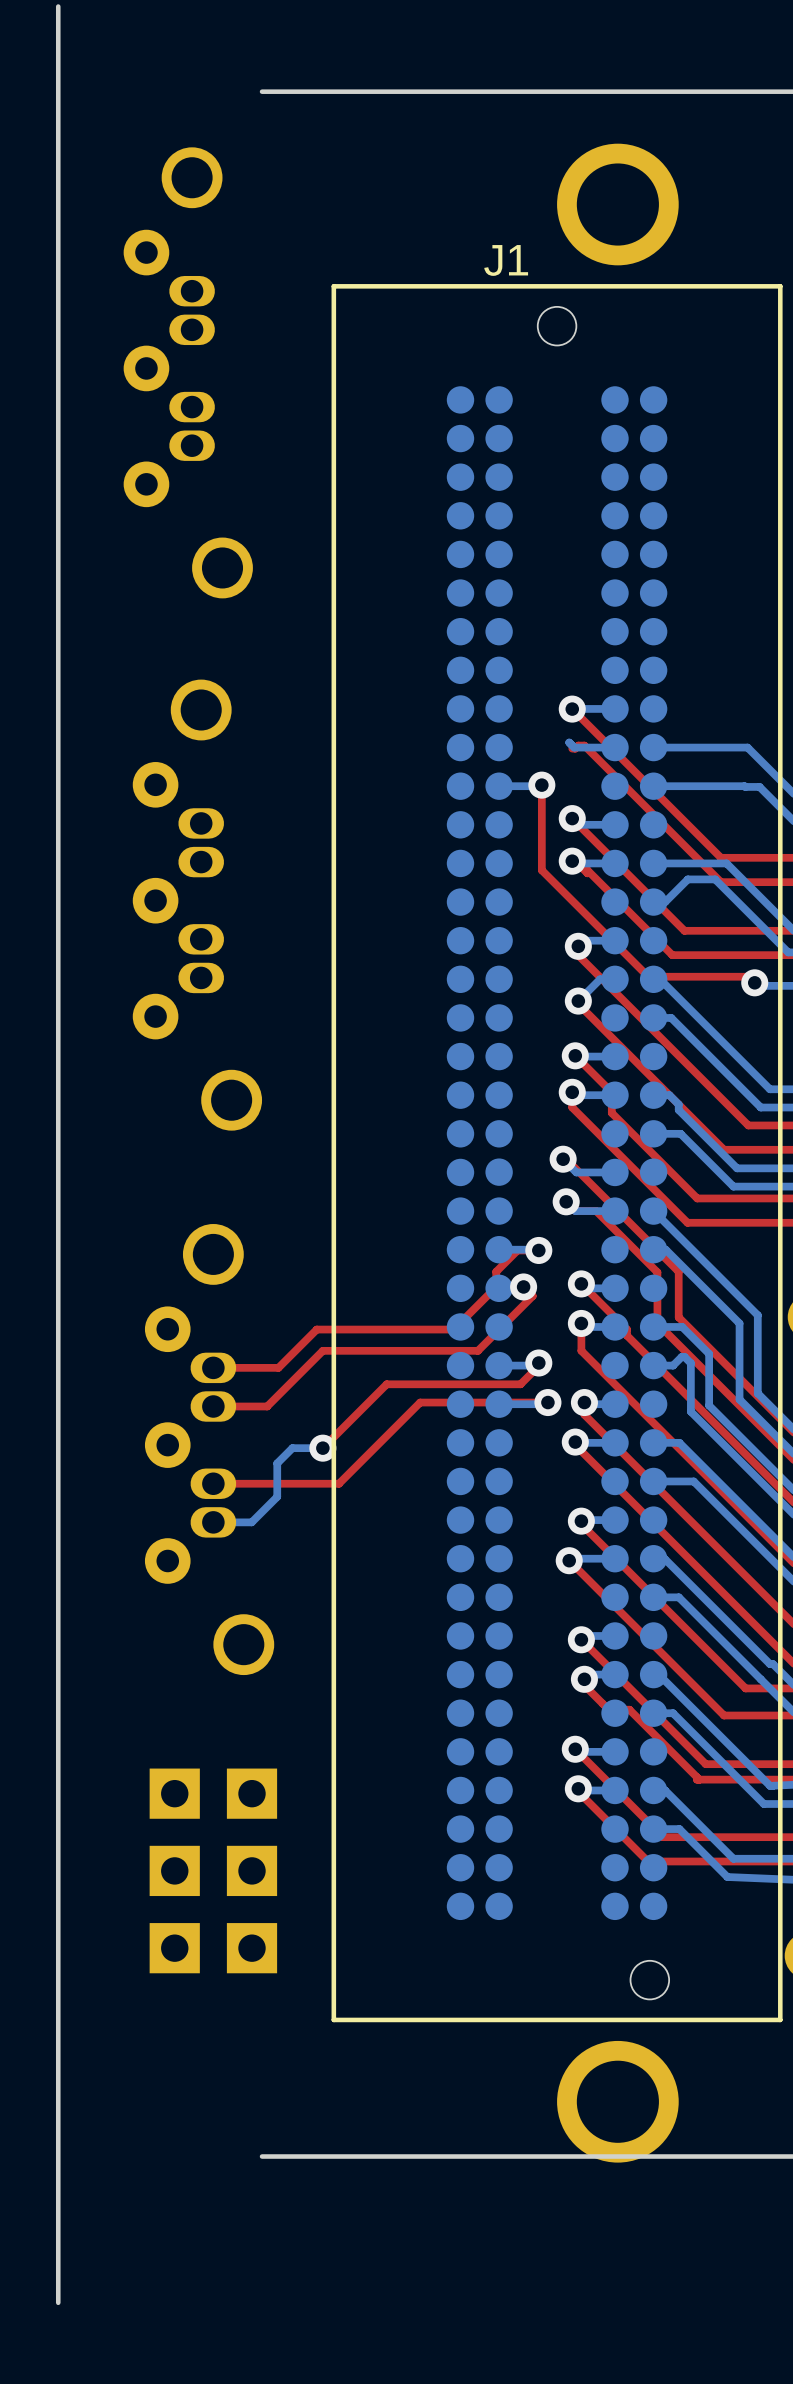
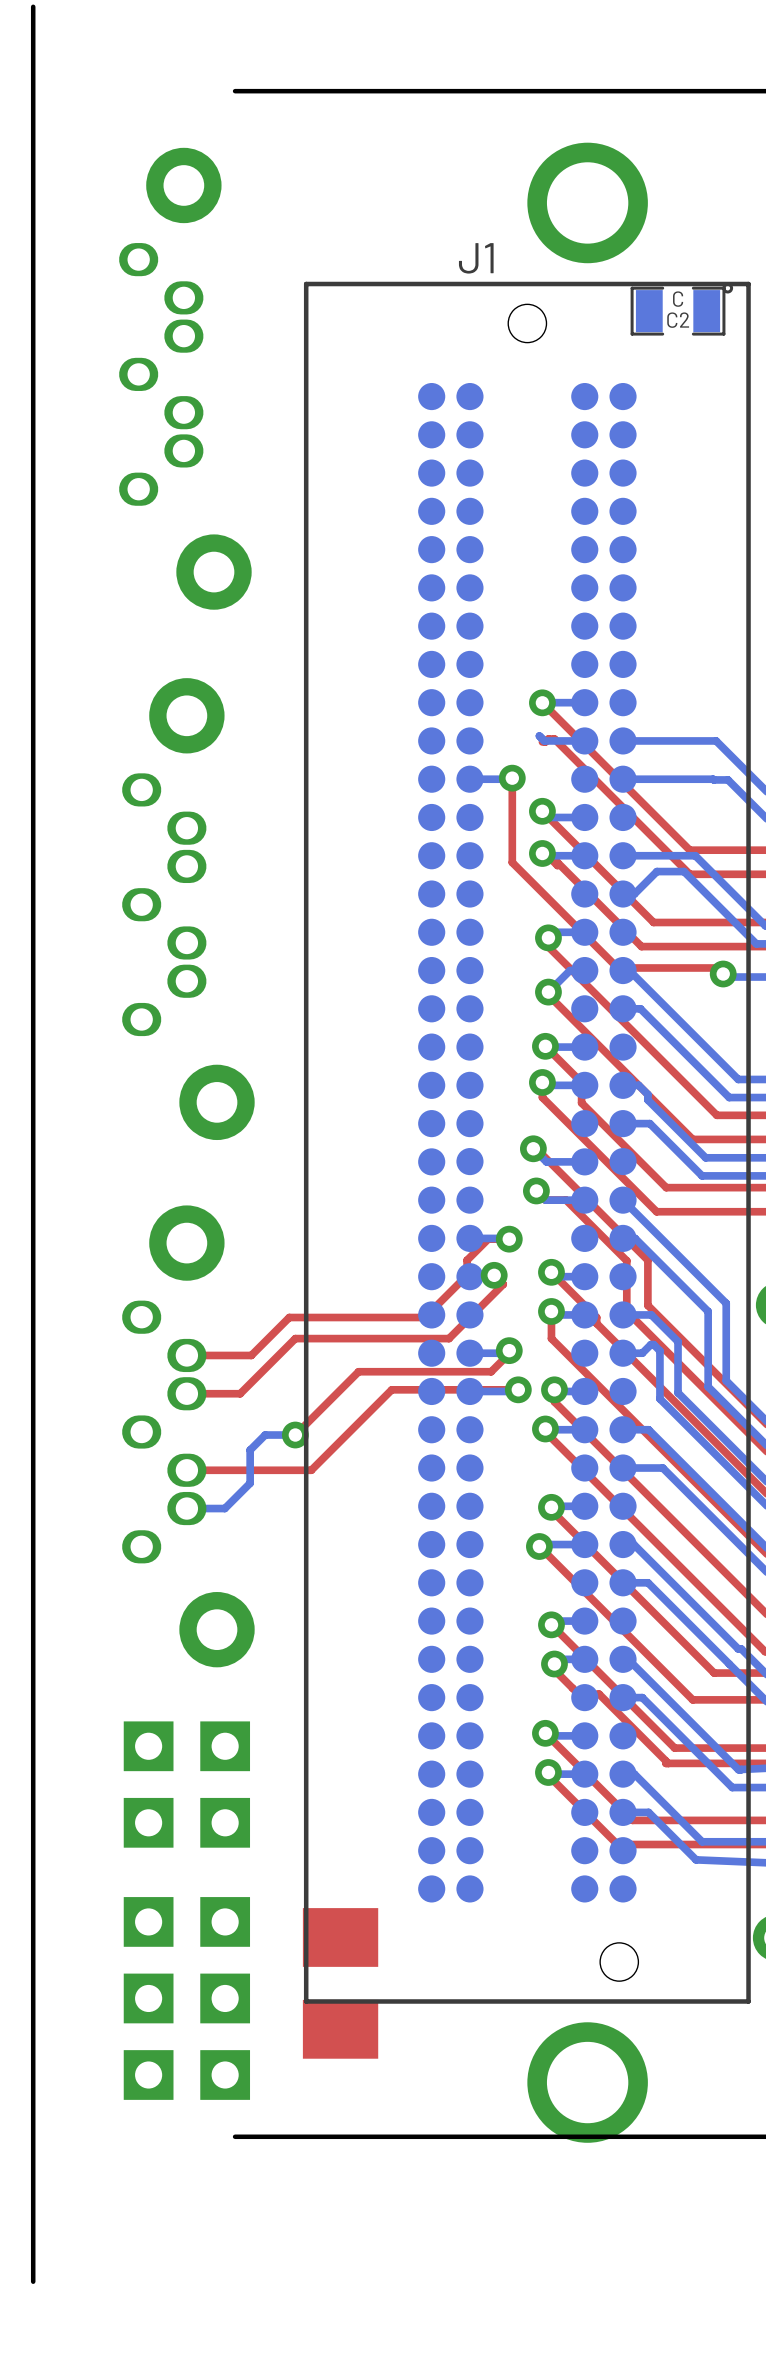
part footprint: [123, 147, 253, 599] -> [119, 147, 252, 610]
C2: none -> C (681, 309)
part footprint: [132, 679, 263, 1131] -> [122, 678, 255, 1141]
part footprint: [144, 1224, 275, 1676] -> [122, 1205, 255, 1668]
part: none -> (186, 1784)
part position: (213, 1870) -> (186, 1998)
part: none -> (340, 1983)

